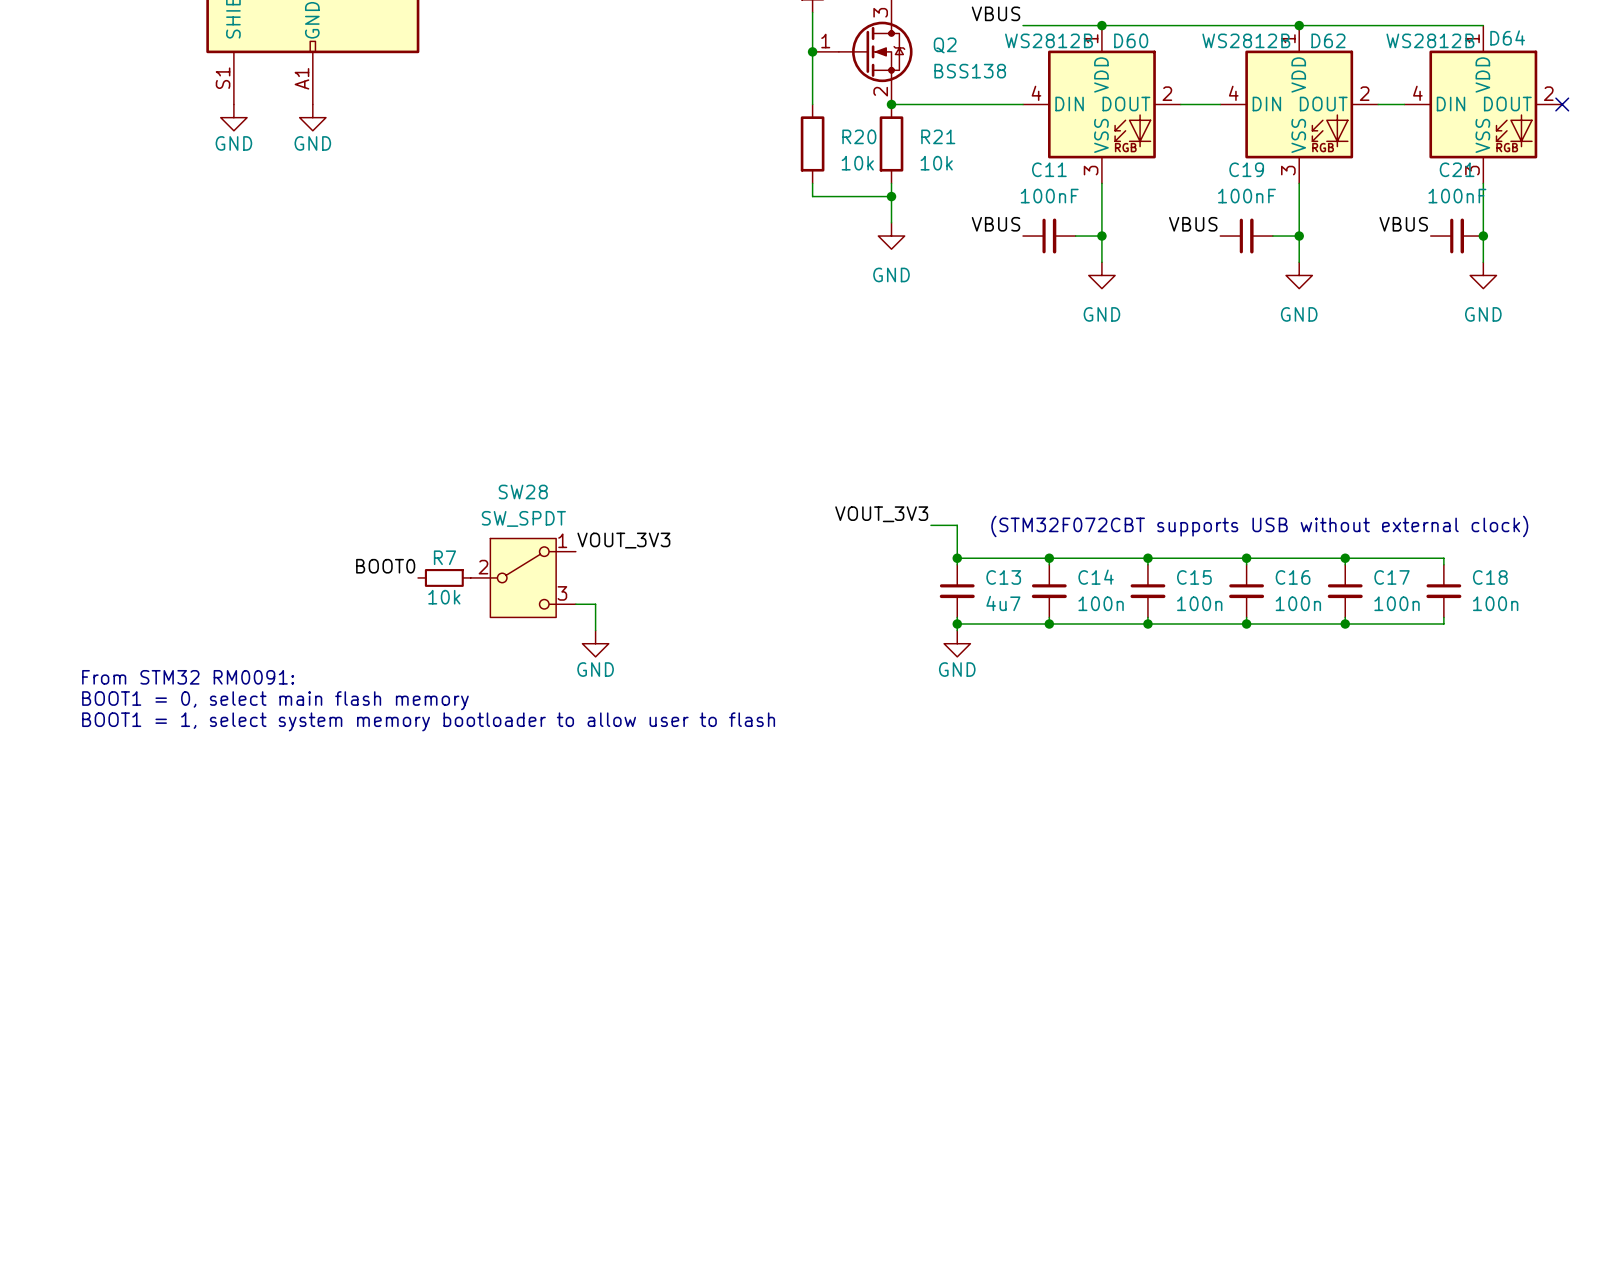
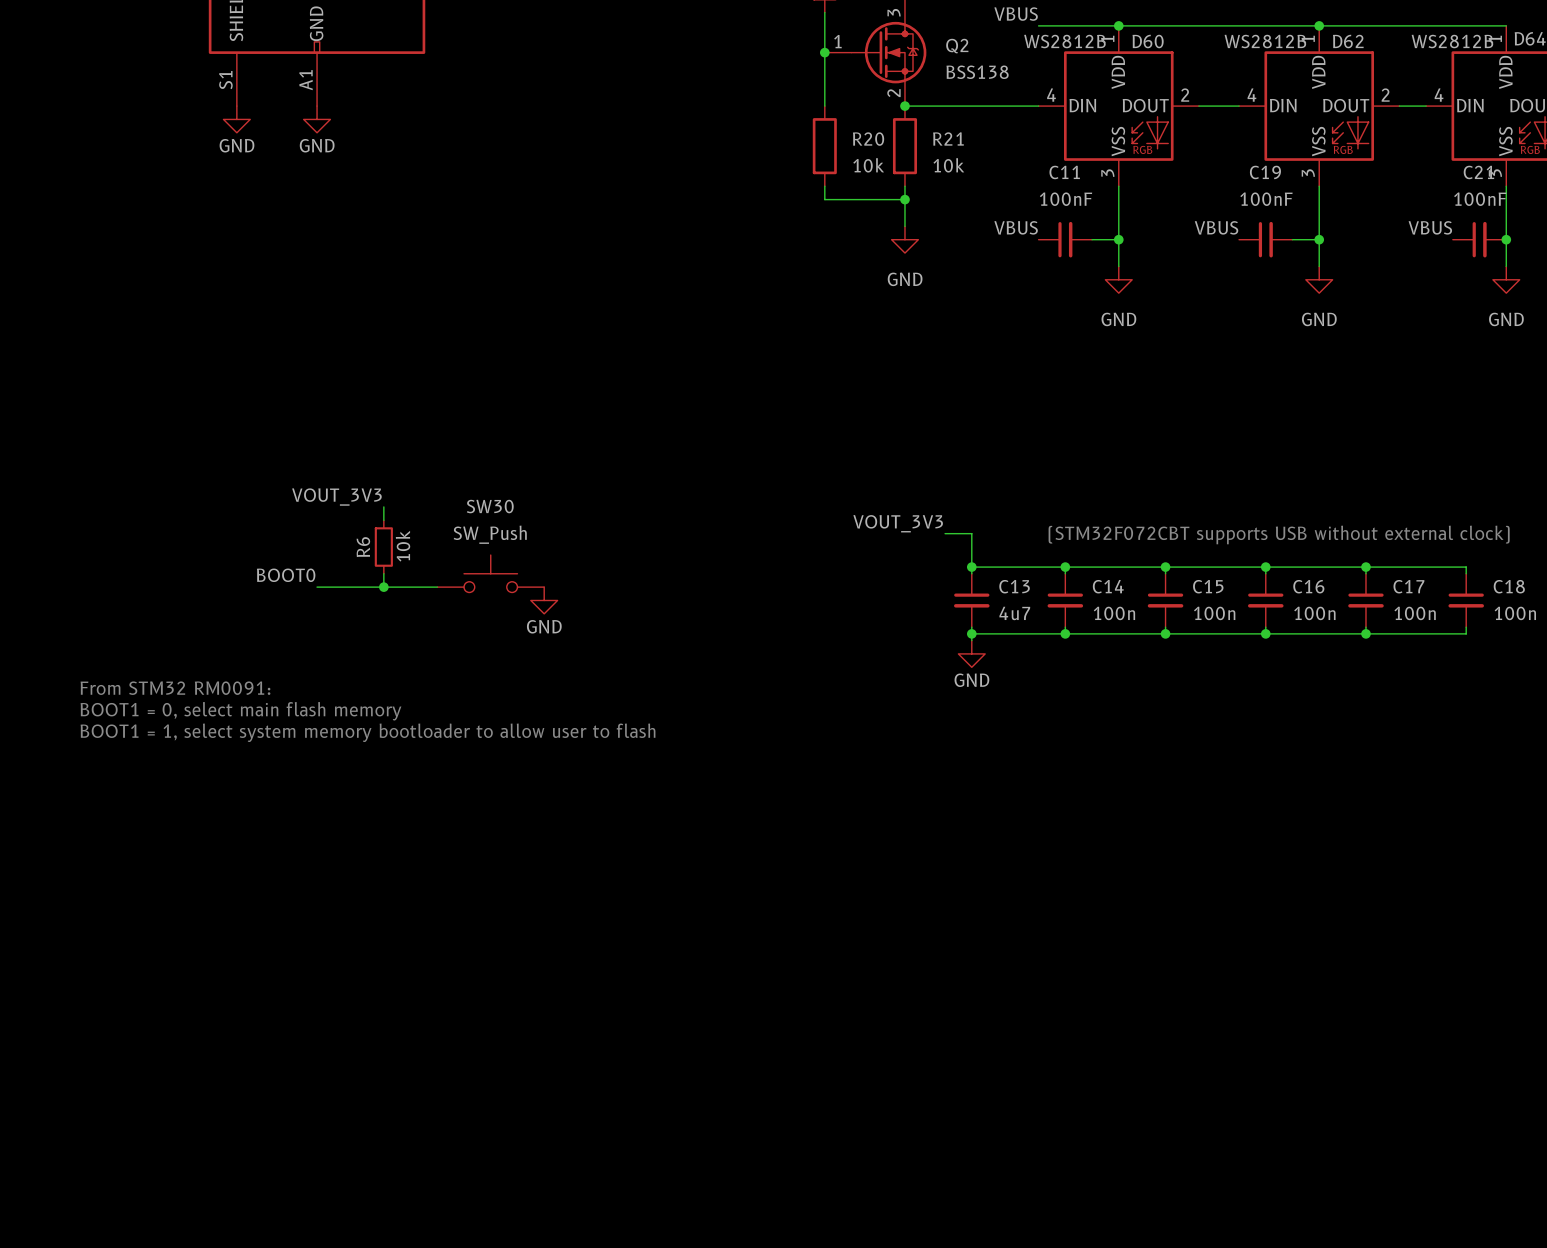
wire: none -> (383, 506) (383, 520)
R6: none -> 10k (383, 547)
label position: VOUT_3V3 (623, 540) -> VOUT_3V3 (336, 497)
wire: none -> (383, 573) (383, 587)
SW30: none -> SW_Push (490, 573)
label position: BOOT0 (385, 566) -> BOOT0 (286, 575)
wire: none -> (317, 587) (437, 587)
junction: none -> (383, 587)
R7: 10k (444, 577) -> none
SW28: SW_SPDT (523, 577) -> none
wire: (575, 604) (595, 604) (595, 630) -> none
power symbol position: GND (595, 643) -> GND (544, 600)

